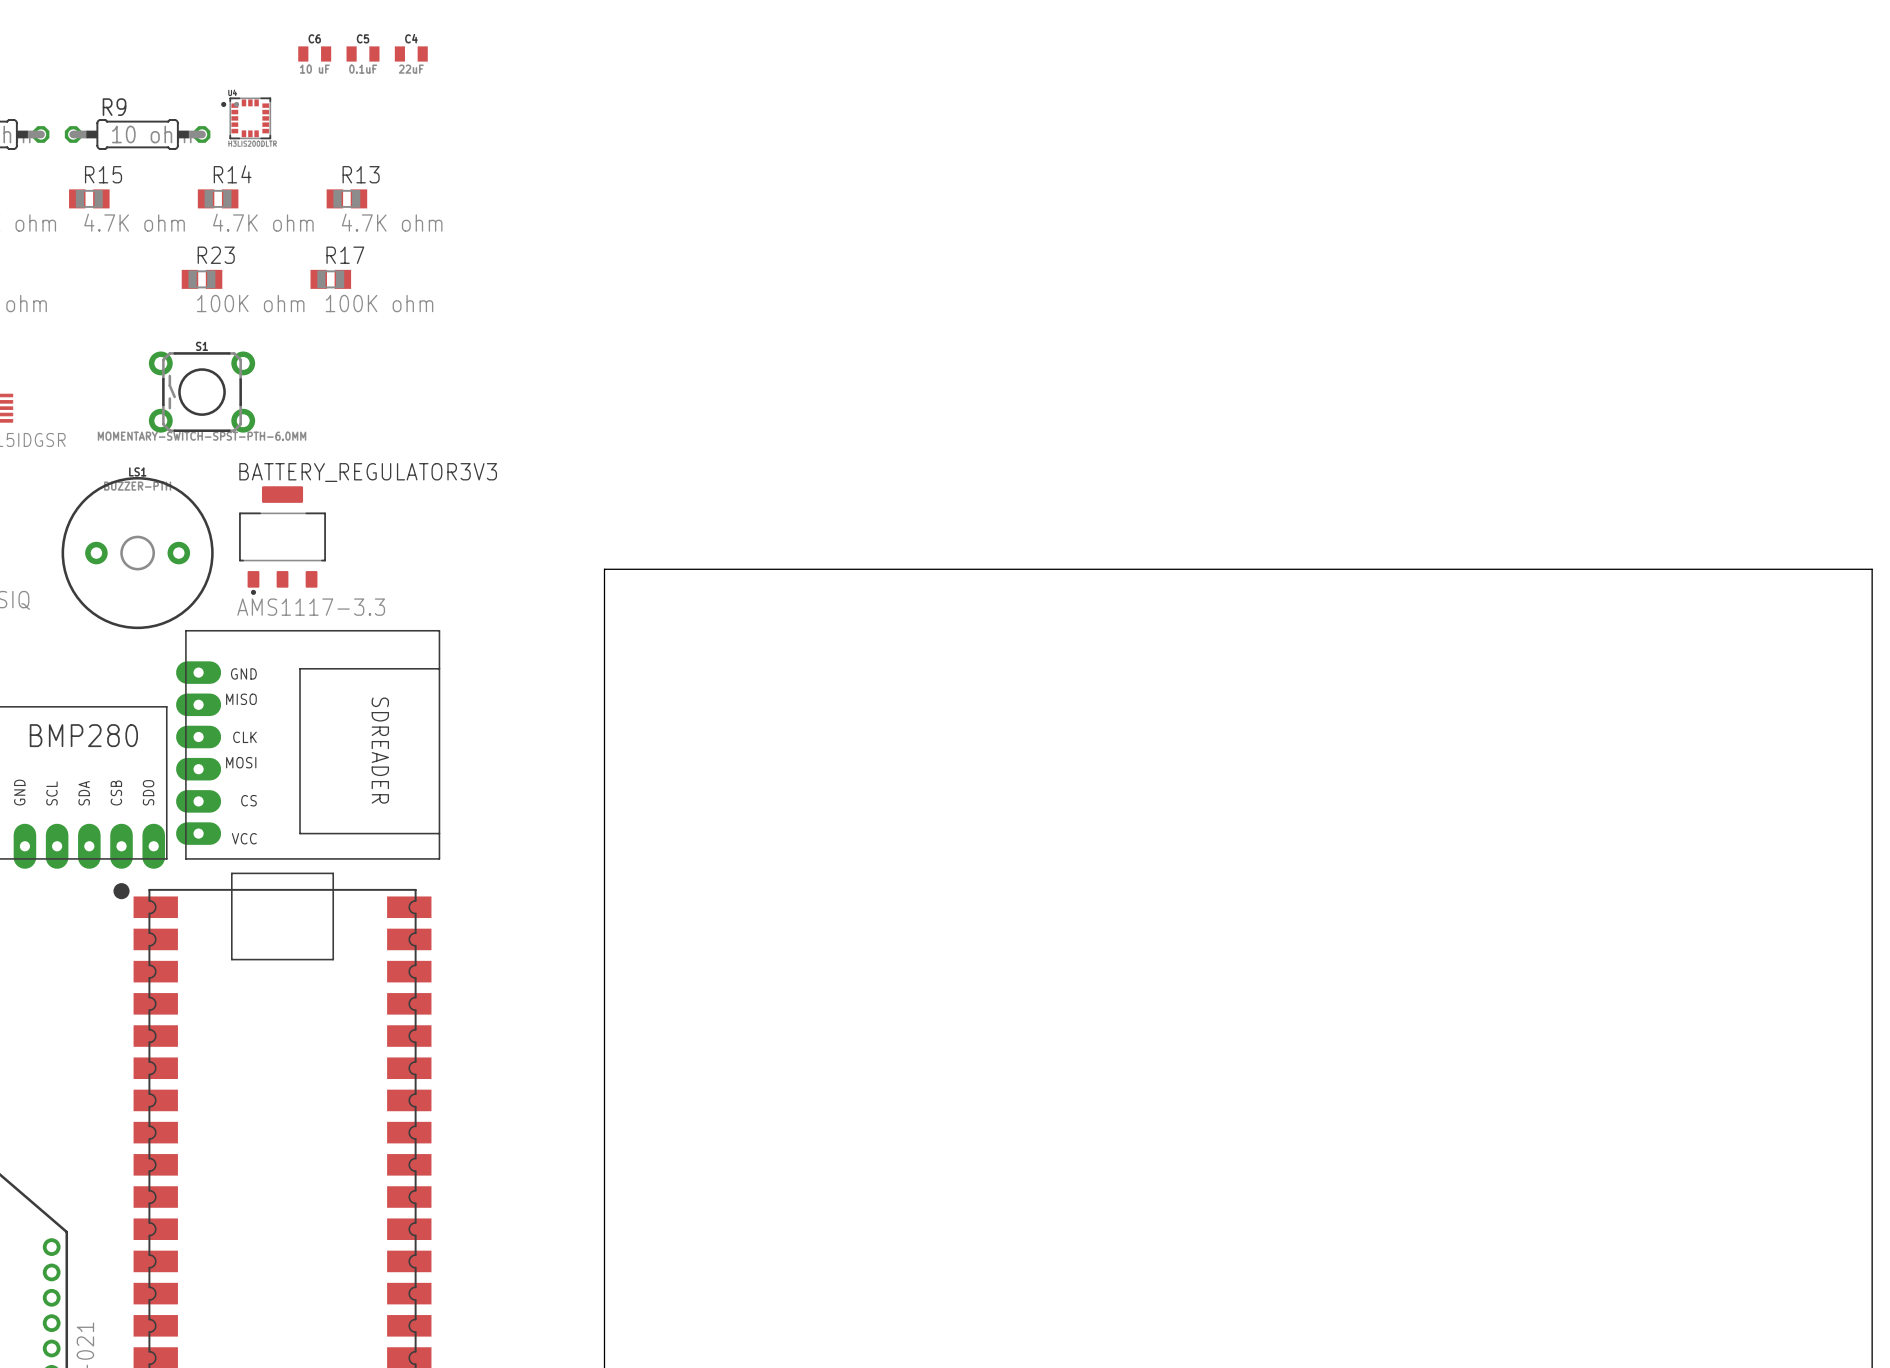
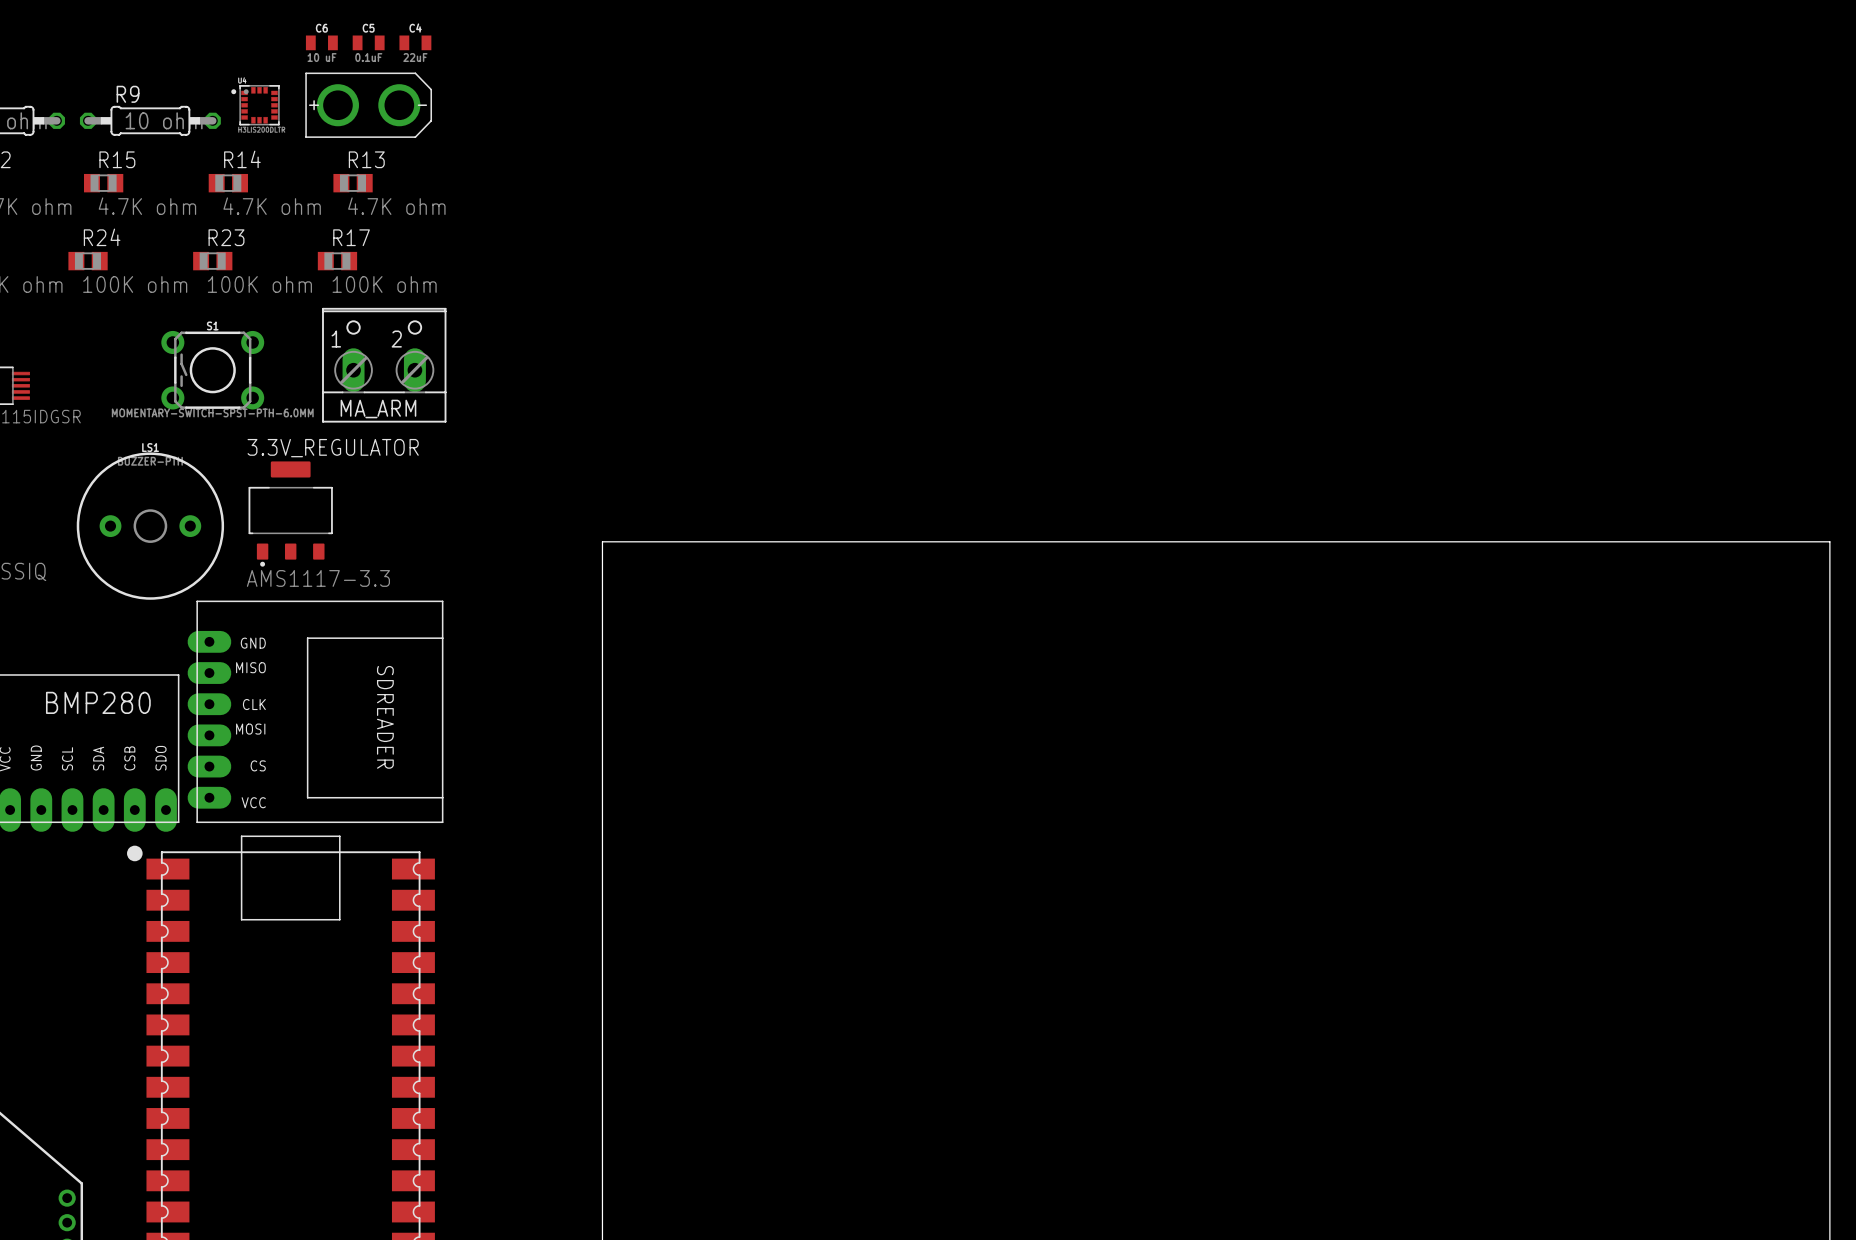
part: none -> (368, 105)
R24: none -> 100K ohm (88, 261)
MA_ARM: none -> (384, 365)
BATTERY_REGULATOR3V3 name: BATTERY_REGULATOR3V3 (368, 472) -> 3.3V_REGULATOR (333, 448)

